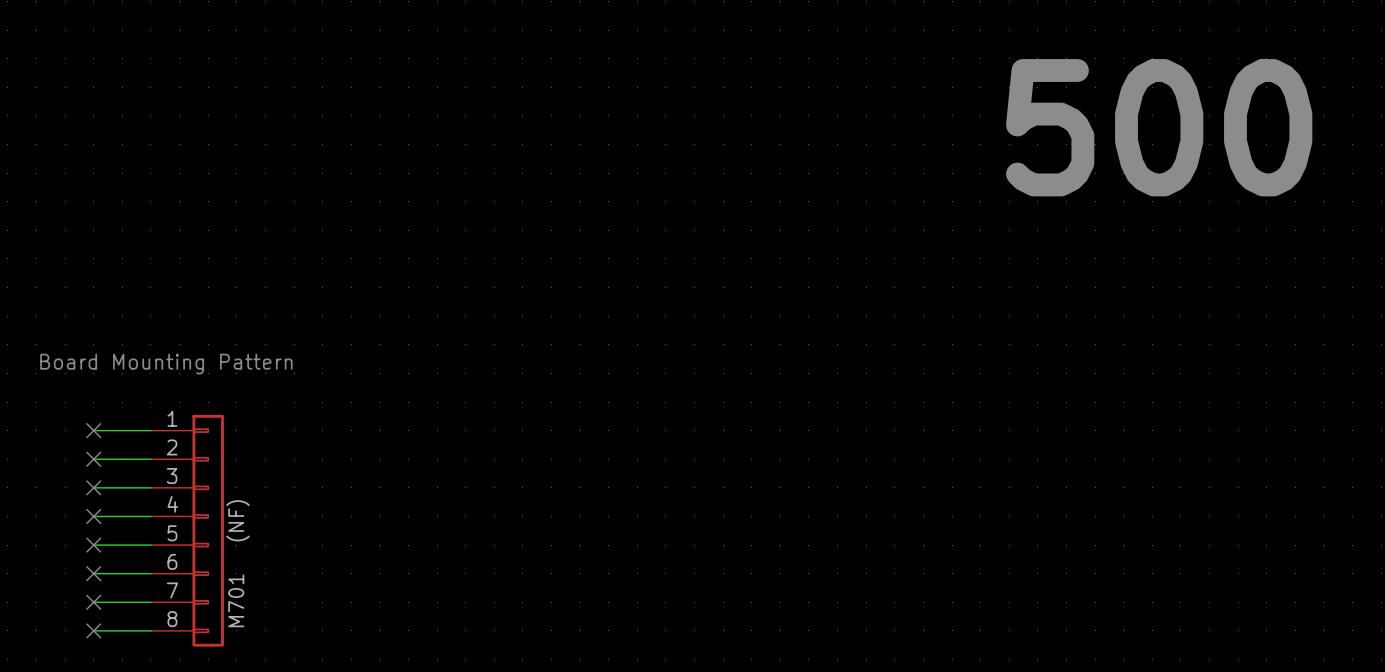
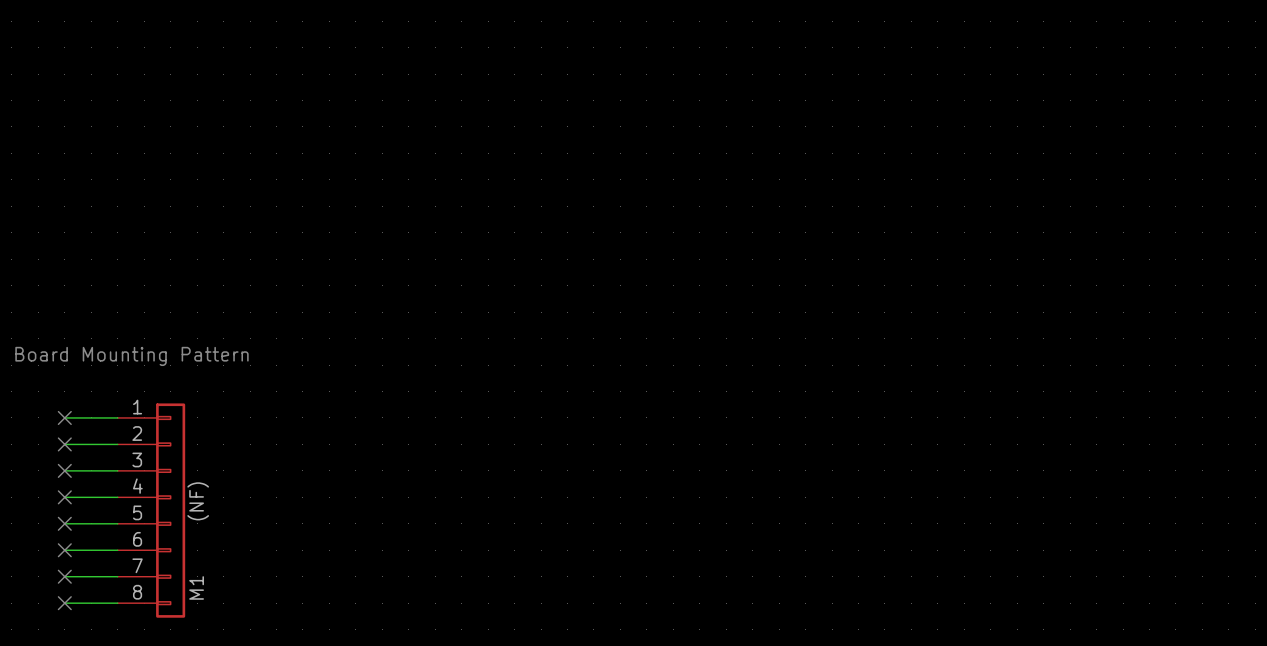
text: 500 (1159, 127) -> none
M701 name: M701 (236, 600) -> M1 (196, 587)

